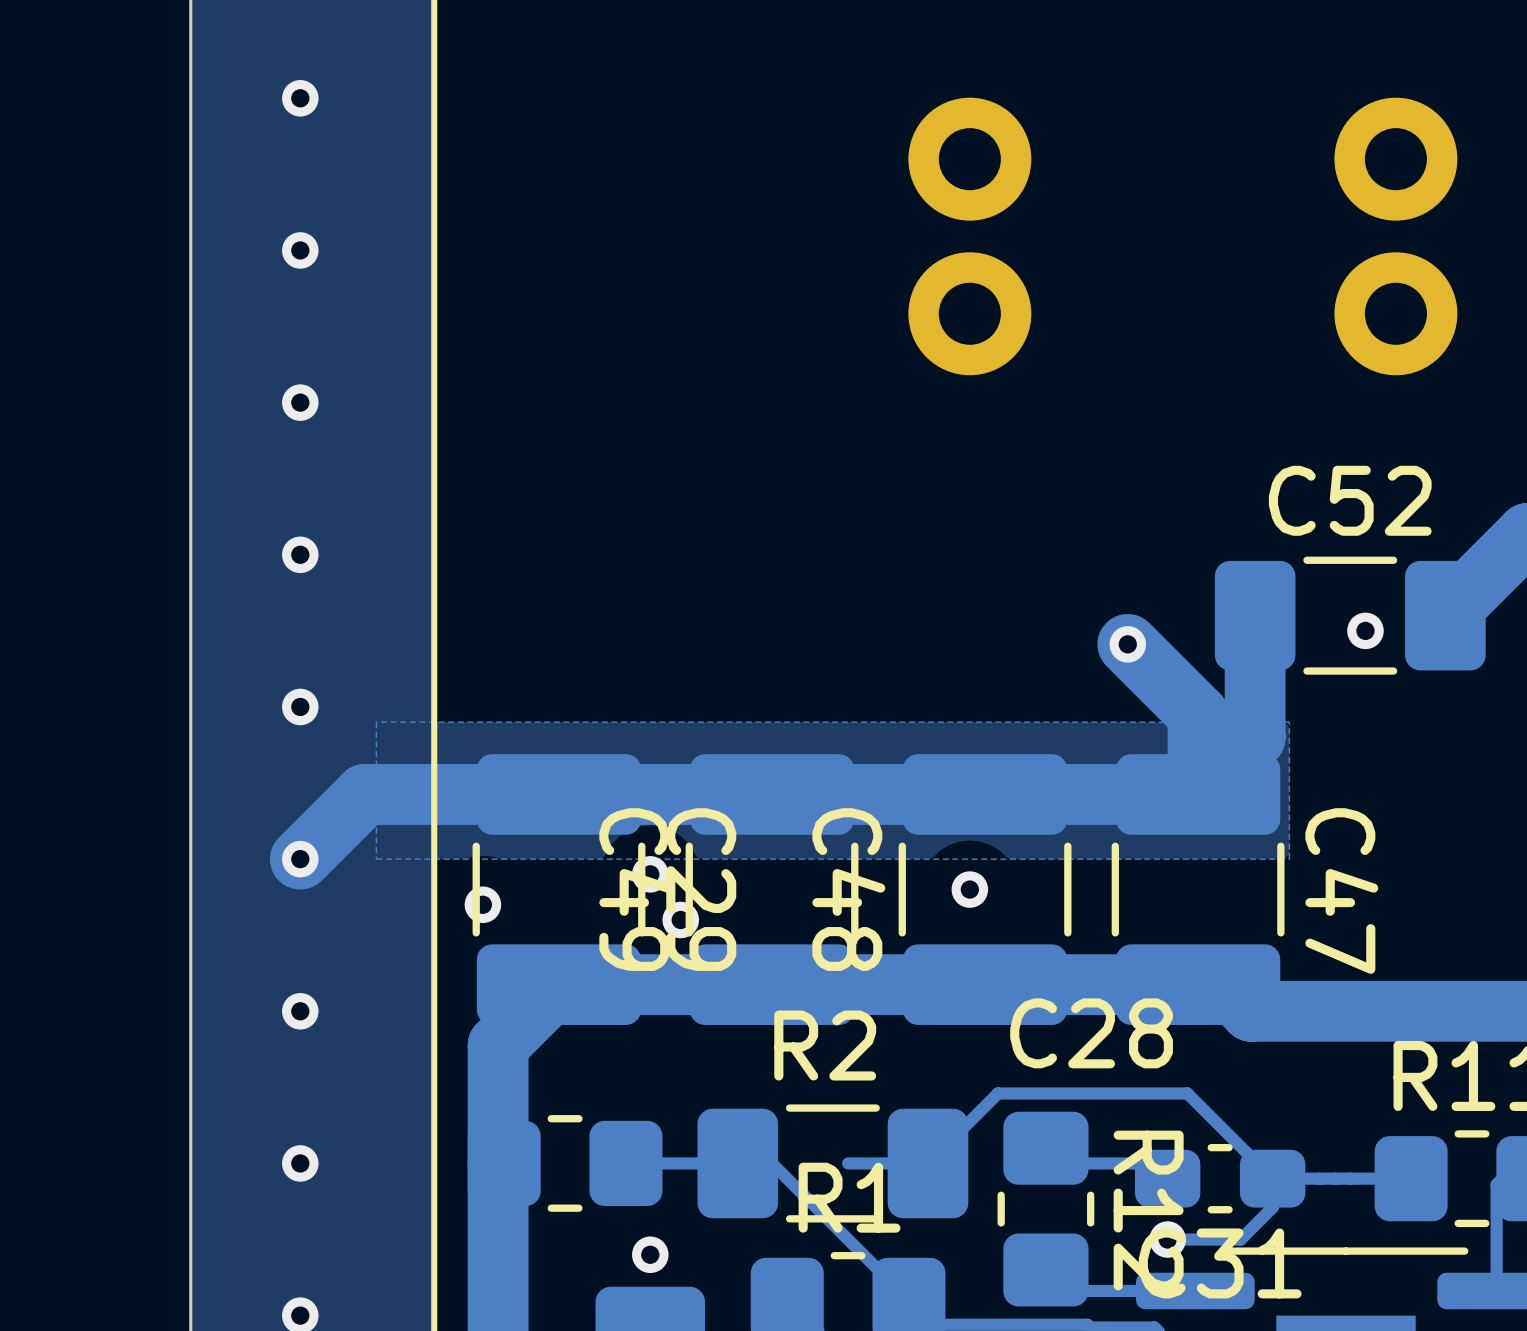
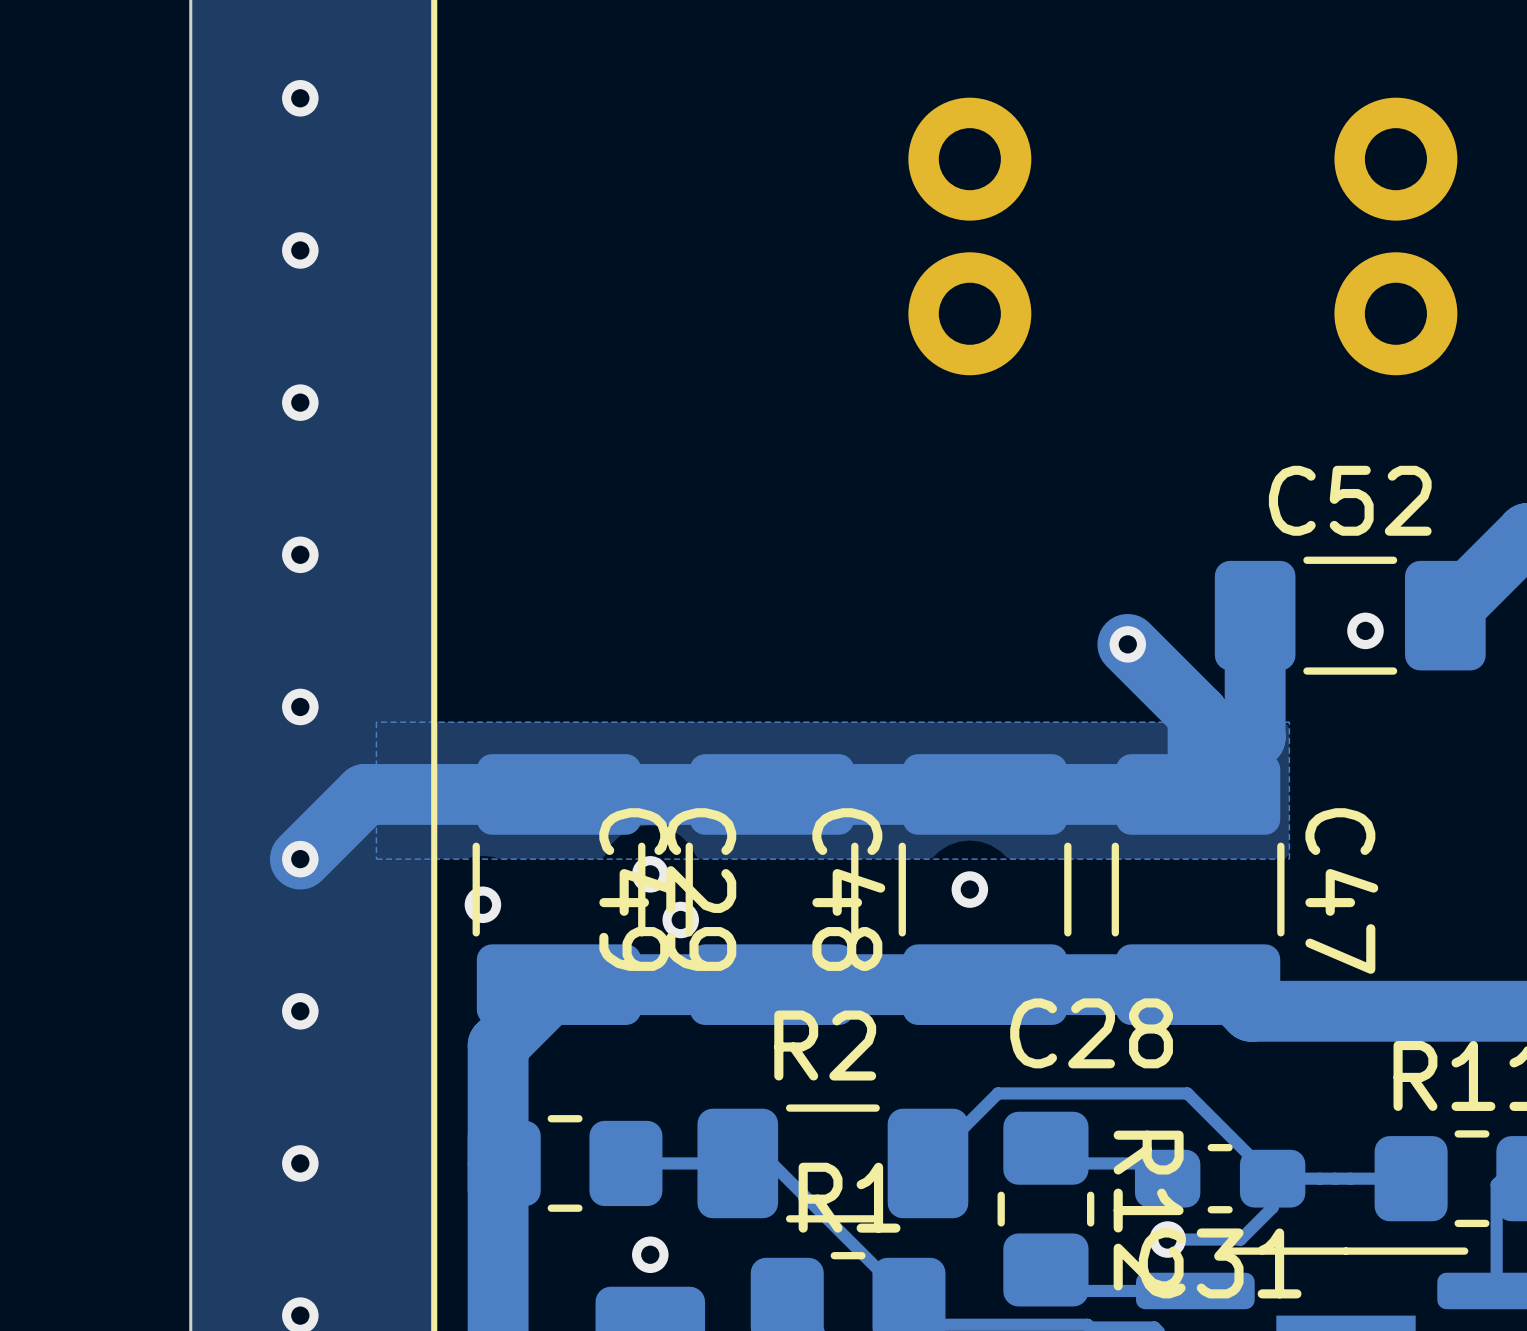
track: (928, 1163) (848, 1163) -> none

